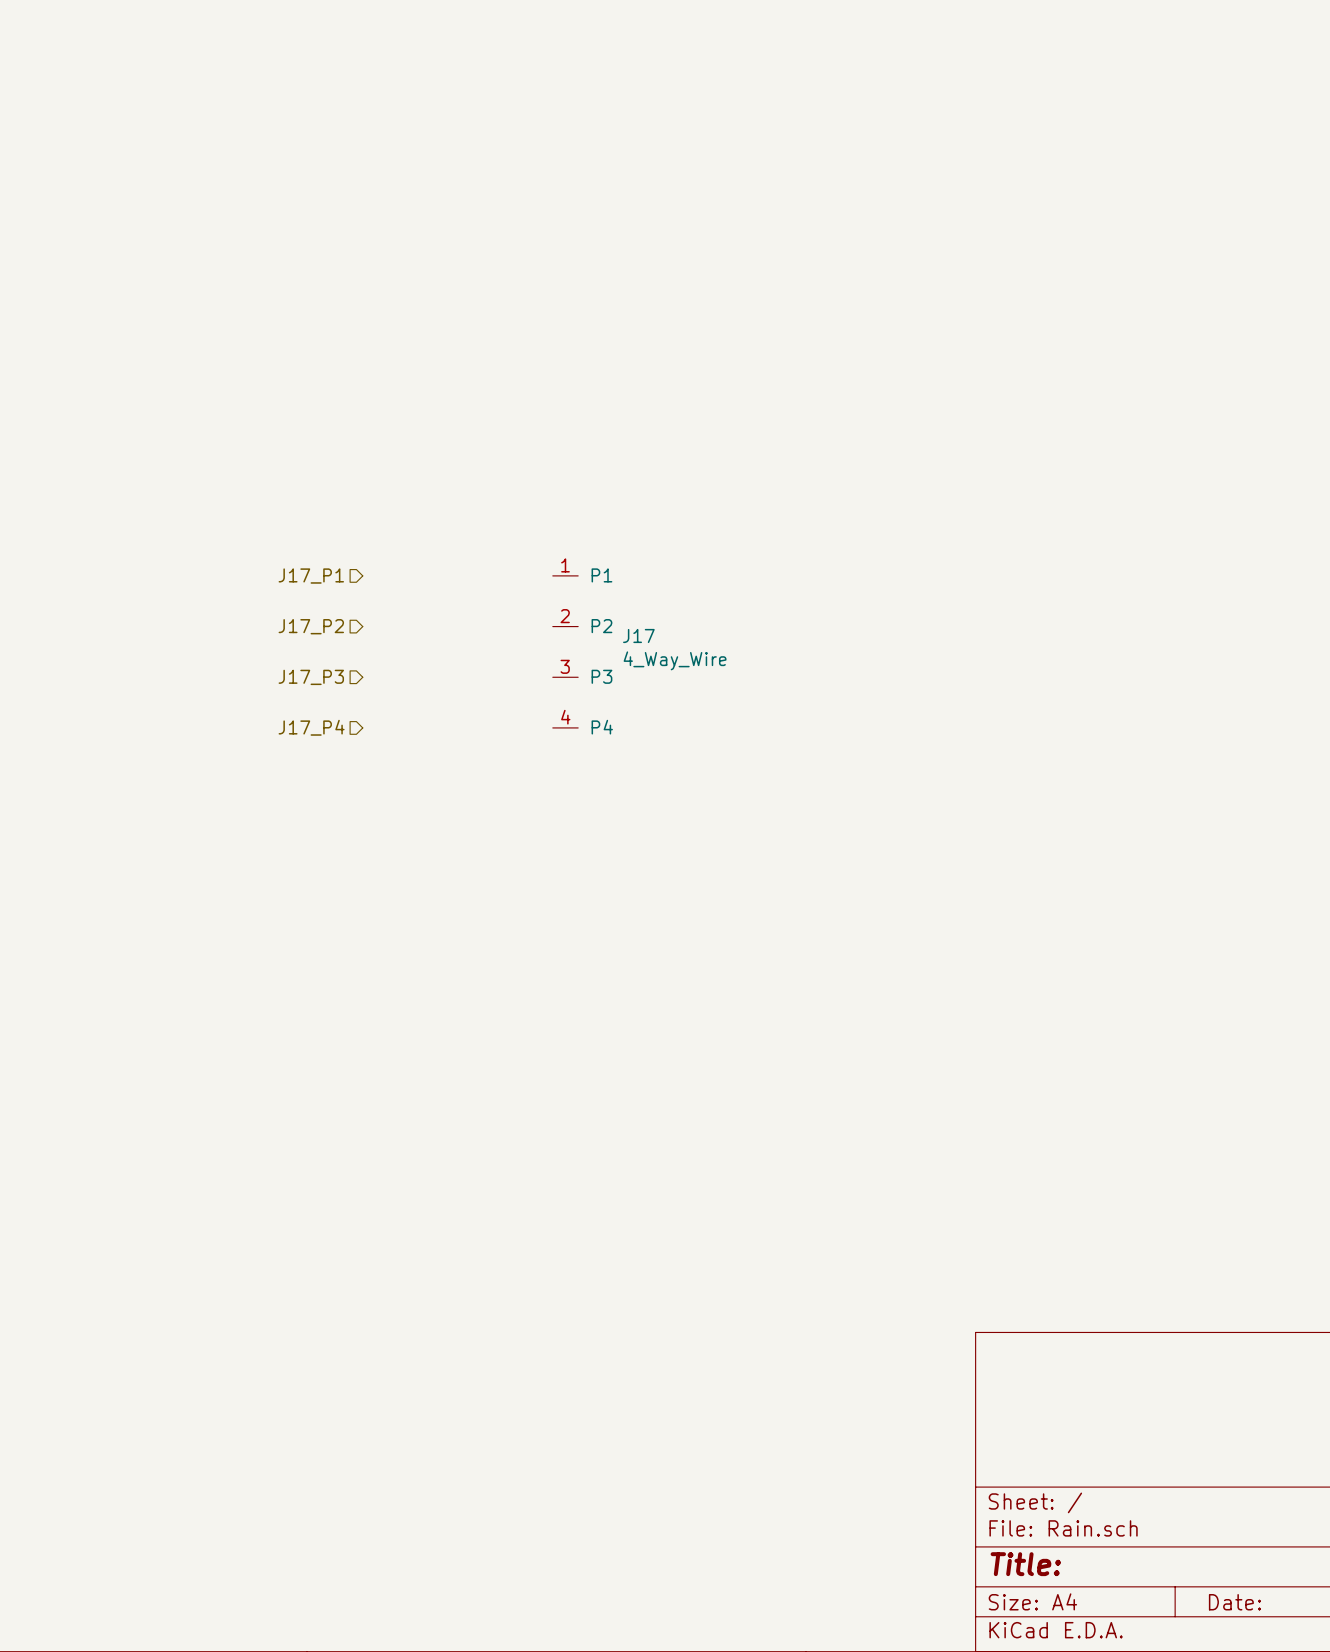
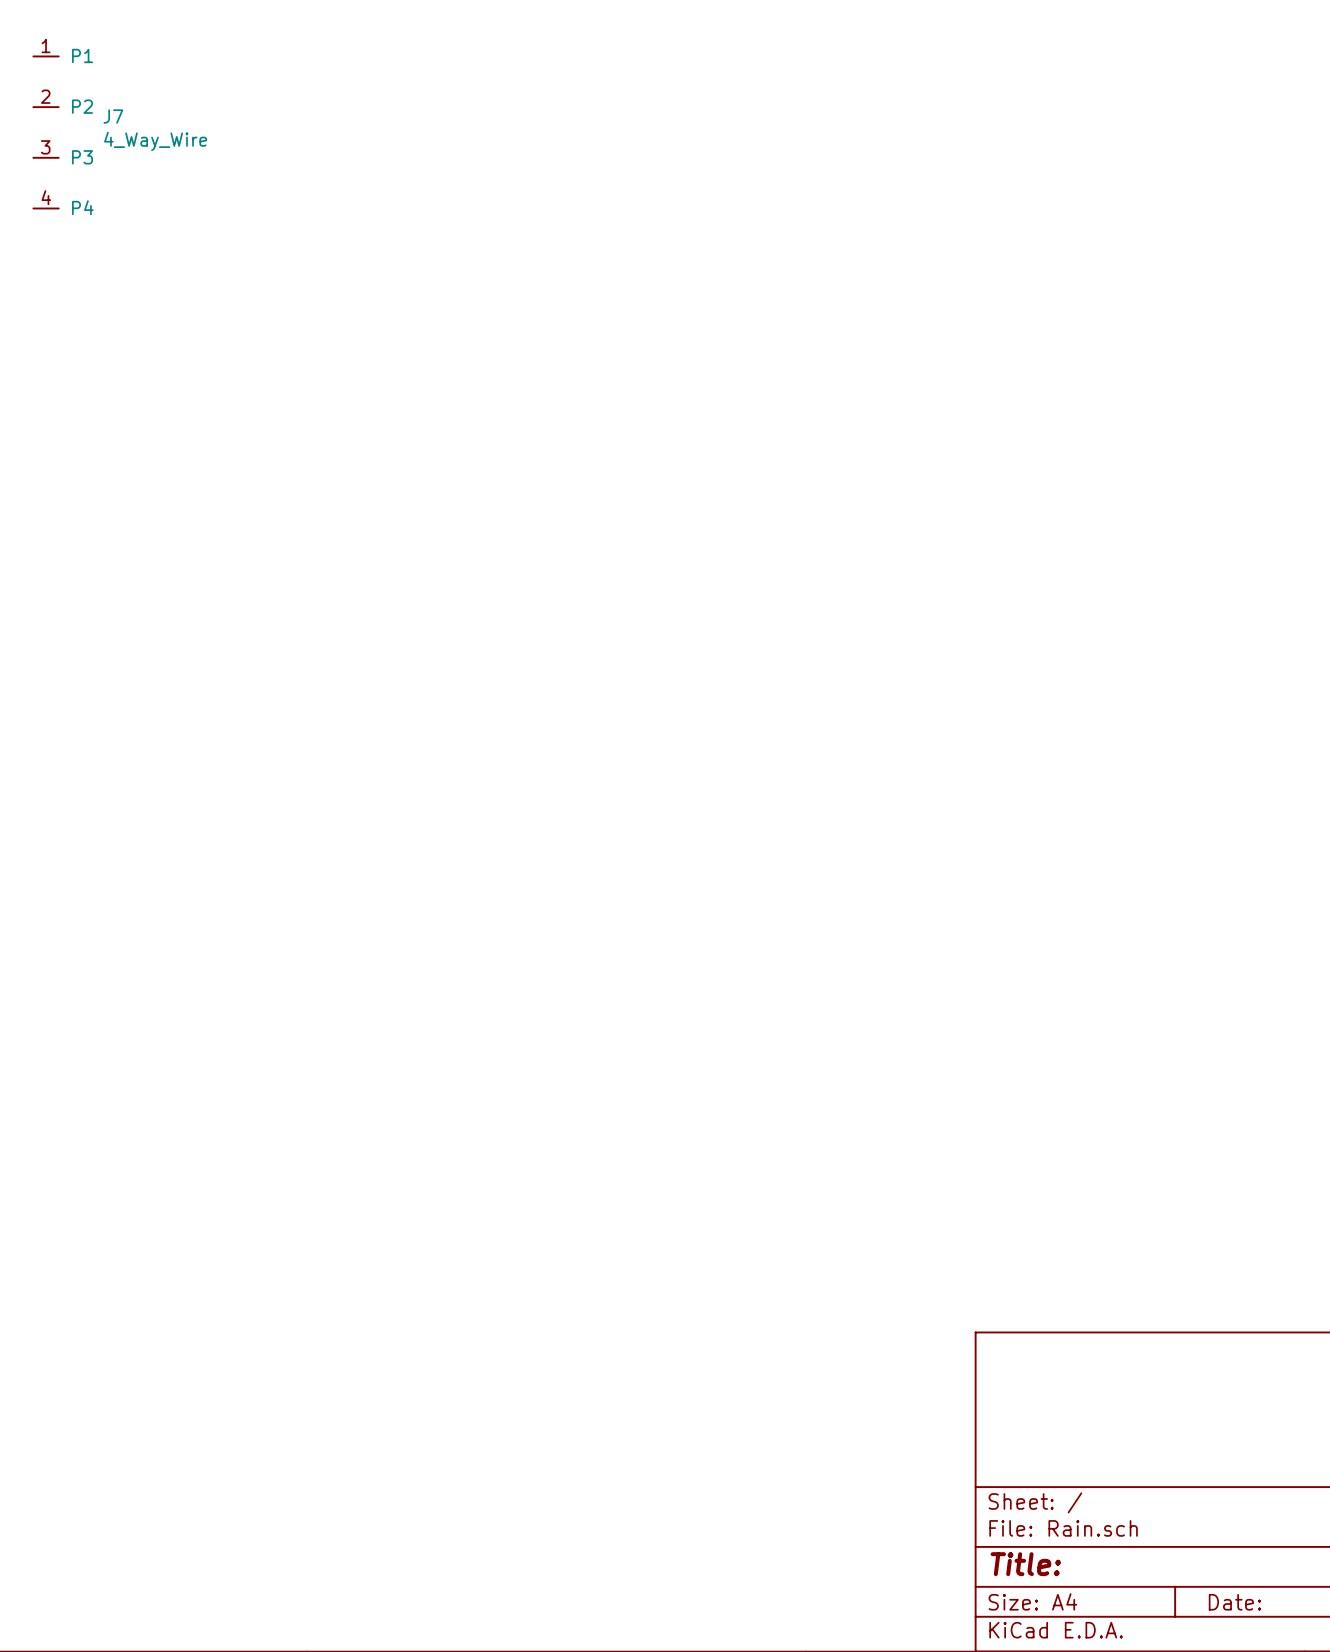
J7: none -> 4_Way_Wire (46, 132)
hierarchical label: J17_P1 (311, 576) -> none
hierarchical label: J17_P2 (311, 626) -> none
J17: 4_Way_Wire (565, 651) -> none
hierarchical label: J17_P3 (311, 677) -> none
hierarchical label: J17_P4 (311, 727) -> none

